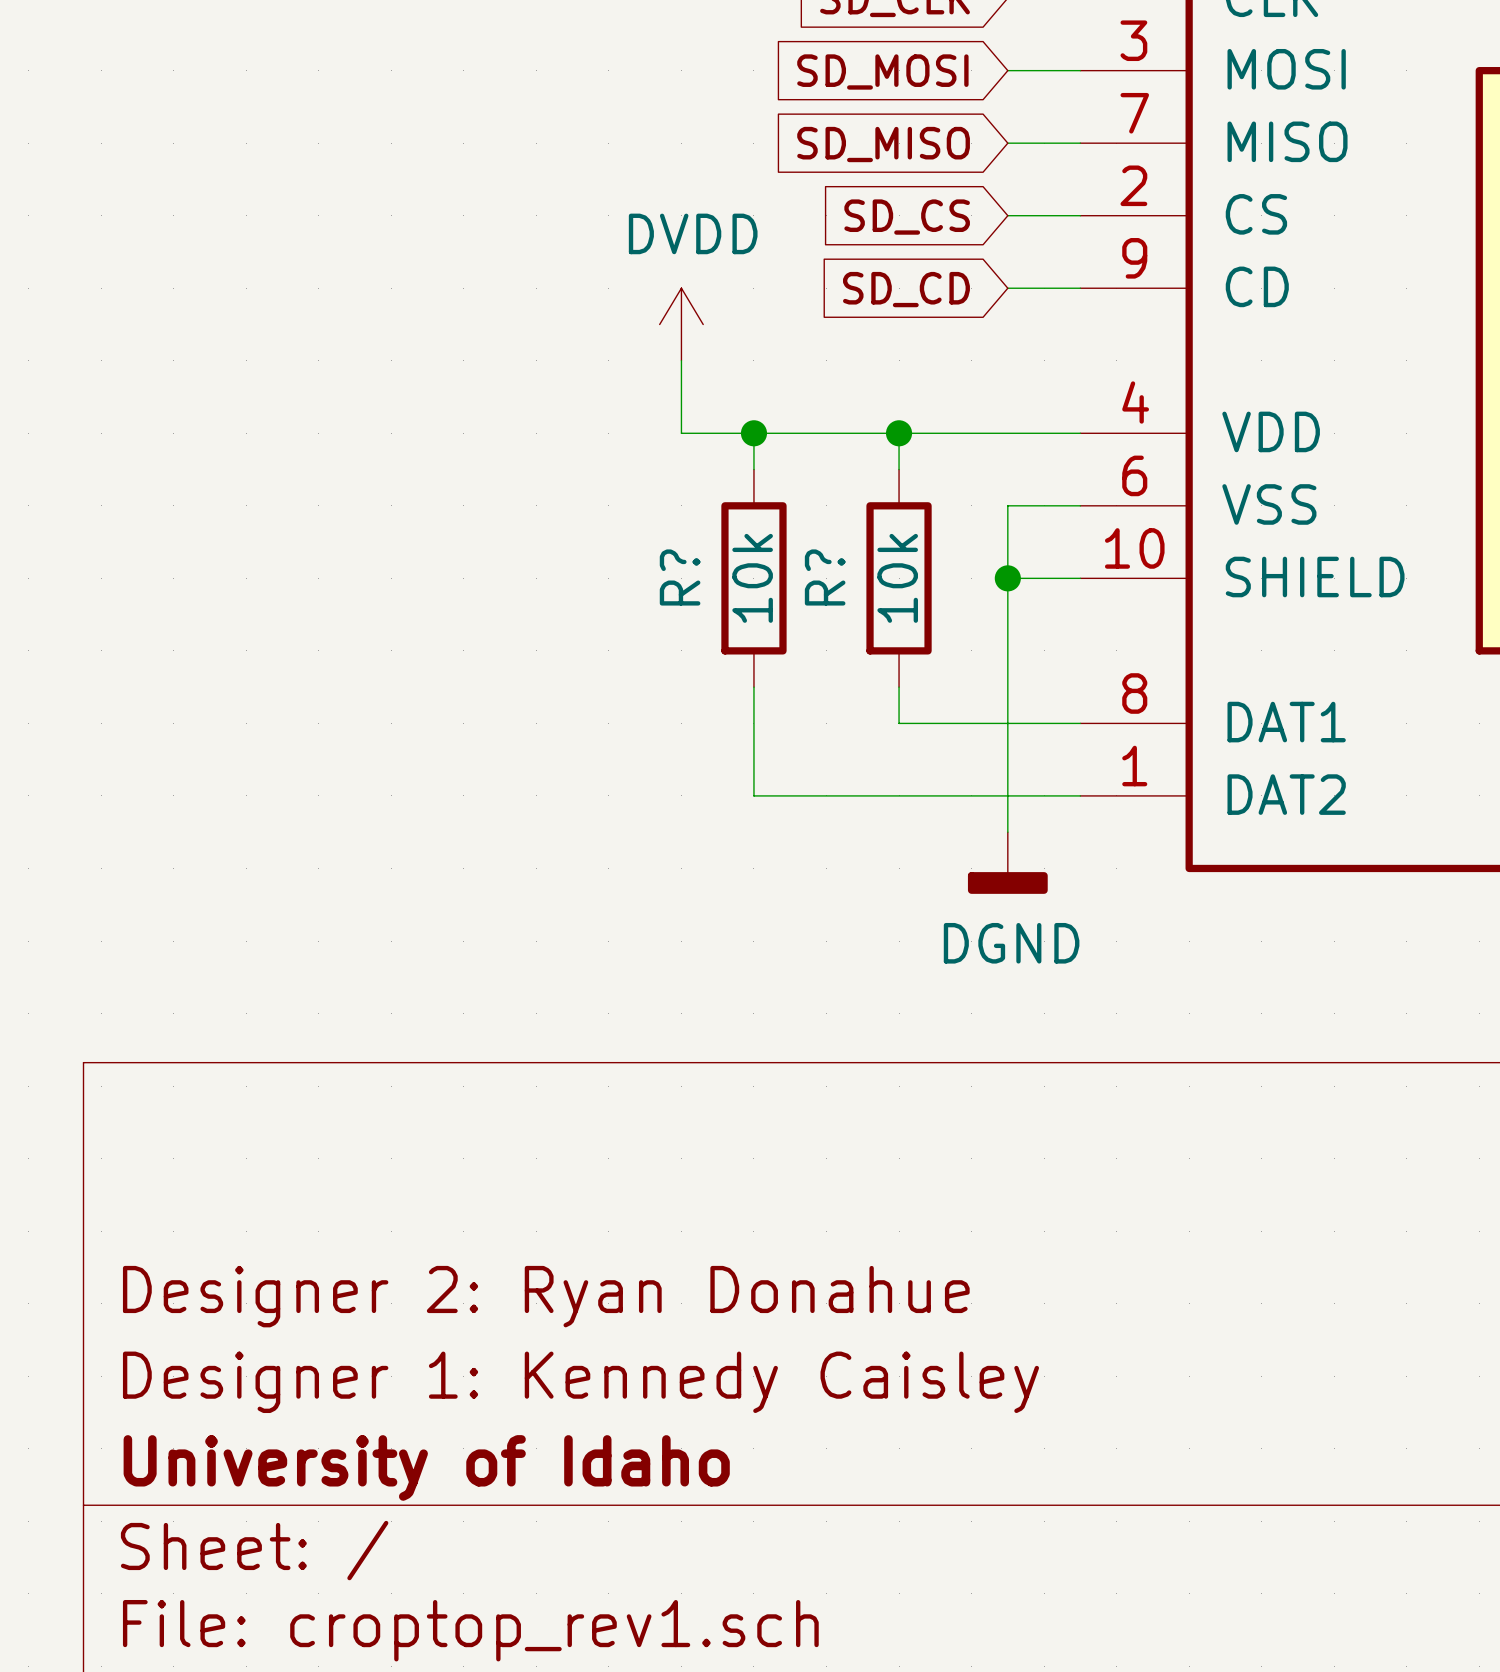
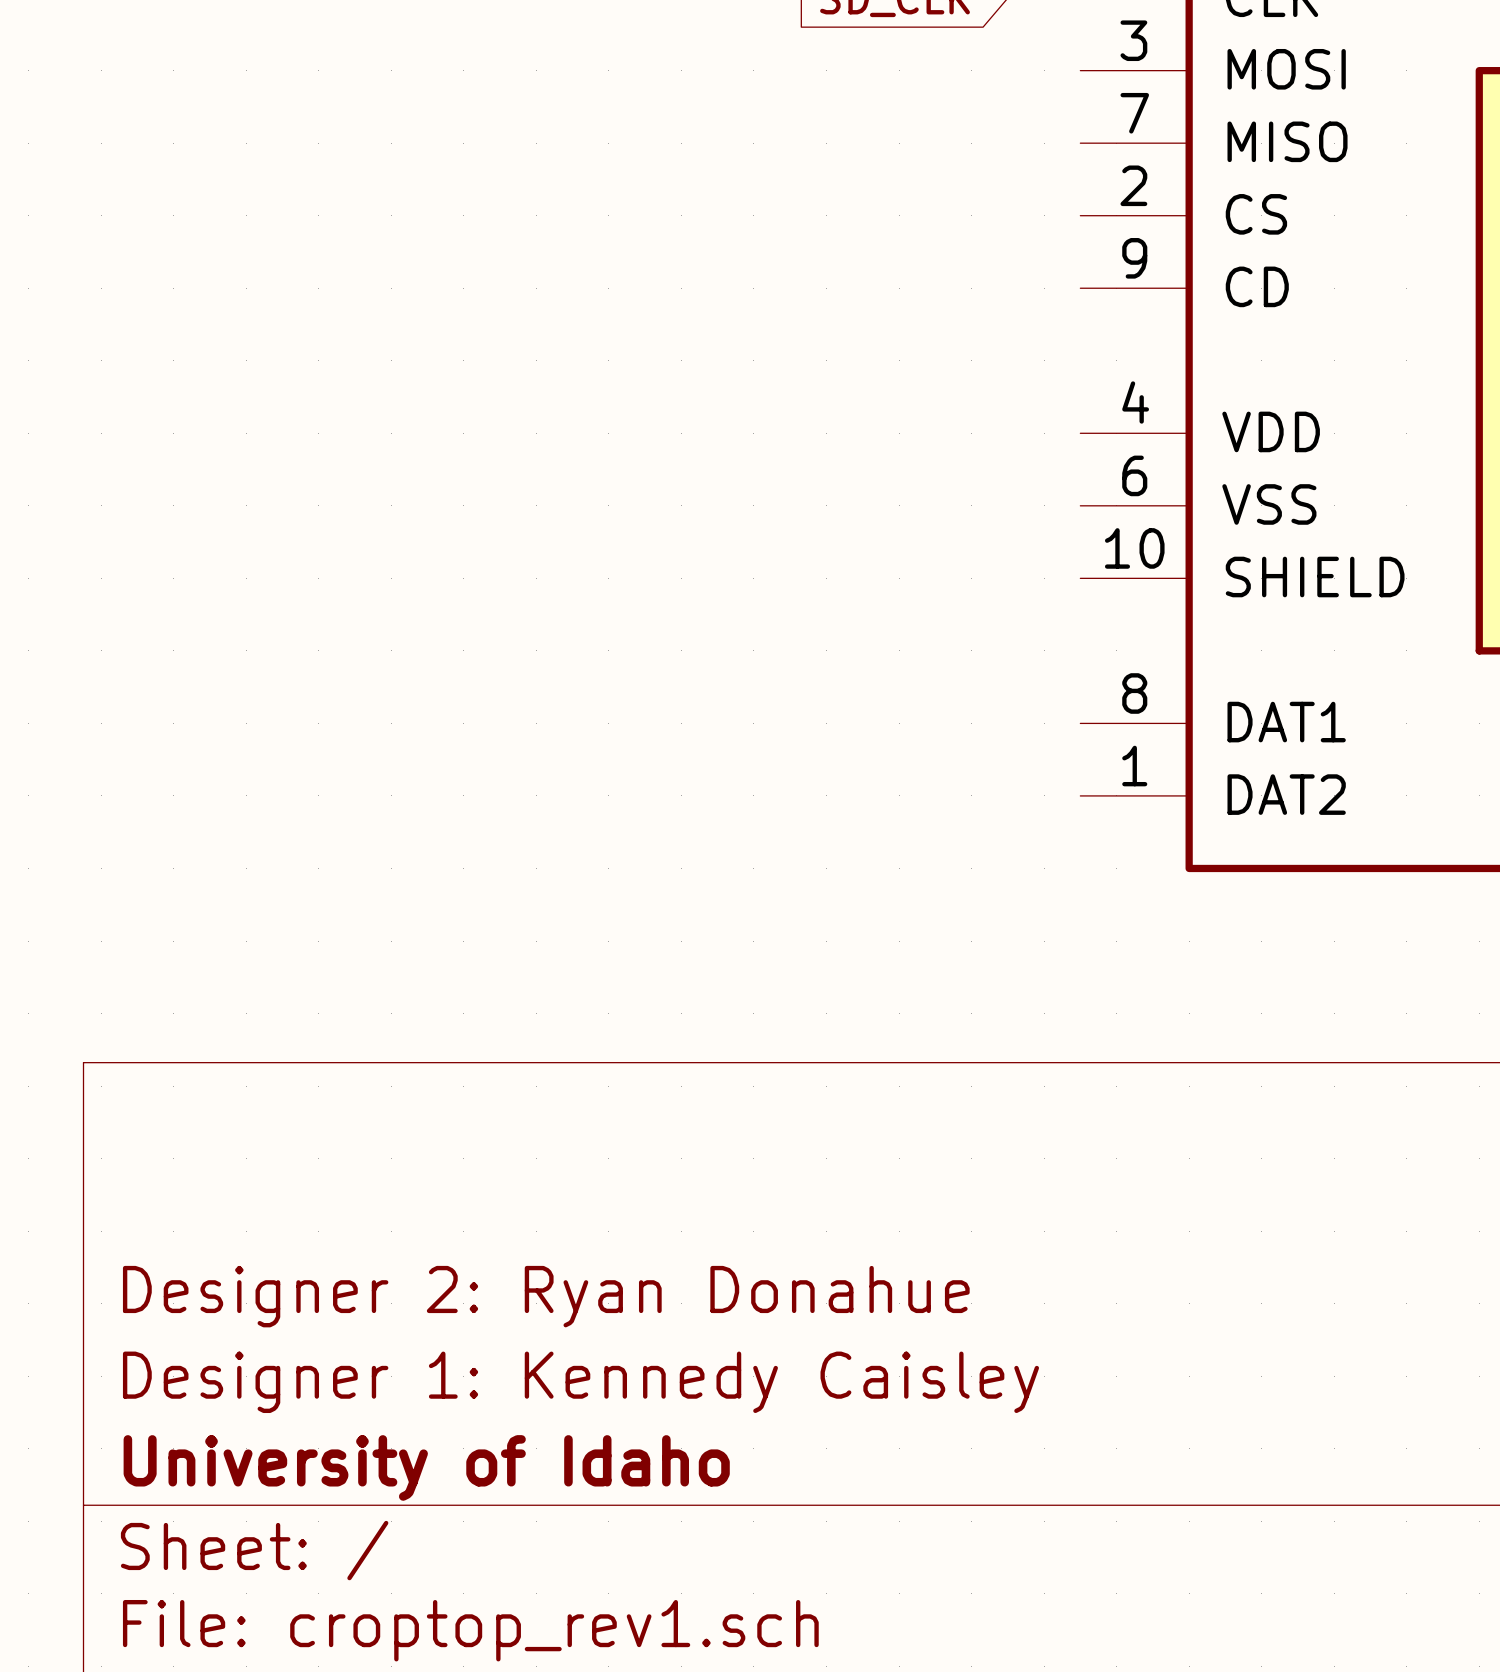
wire: (1007, 70) (1080, 70) -> none
global label: SD_MOSI (882, 71) -> none
wire: (1007, 143) (1080, 143) -> none
global label: SD_MISO (883, 144) -> none
wire: (1007, 215) (1080, 215) -> none
global label: SD_CS (907, 217) -> none
wire: (1007, 288) (1080, 288) -> none
global label: SD_CD (906, 289) -> none
power symbol: DVDD (681, 324) -> none
wire: (681, 360) (681, 433) (1080, 433) -> none
wire: (753, 433) (753, 469) -> none
junction: (753, 433) -> none
wire: (899, 433) (899, 469) -> none
junction: (899, 433) -> none
wire: (1080, 505) (1007, 505) (1007, 832) -> none
R?: 10k (753, 578) -> none
R?: 10k (899, 578) -> none
wire: (1007, 578) (1080, 578) -> none
junction: (1007, 578) -> none
wire: (753, 687) (753, 795) (1080, 795) -> none
wire: (899, 687) (899, 723) (1080, 723) -> none
power symbol: DGND (1007, 863) -> none

